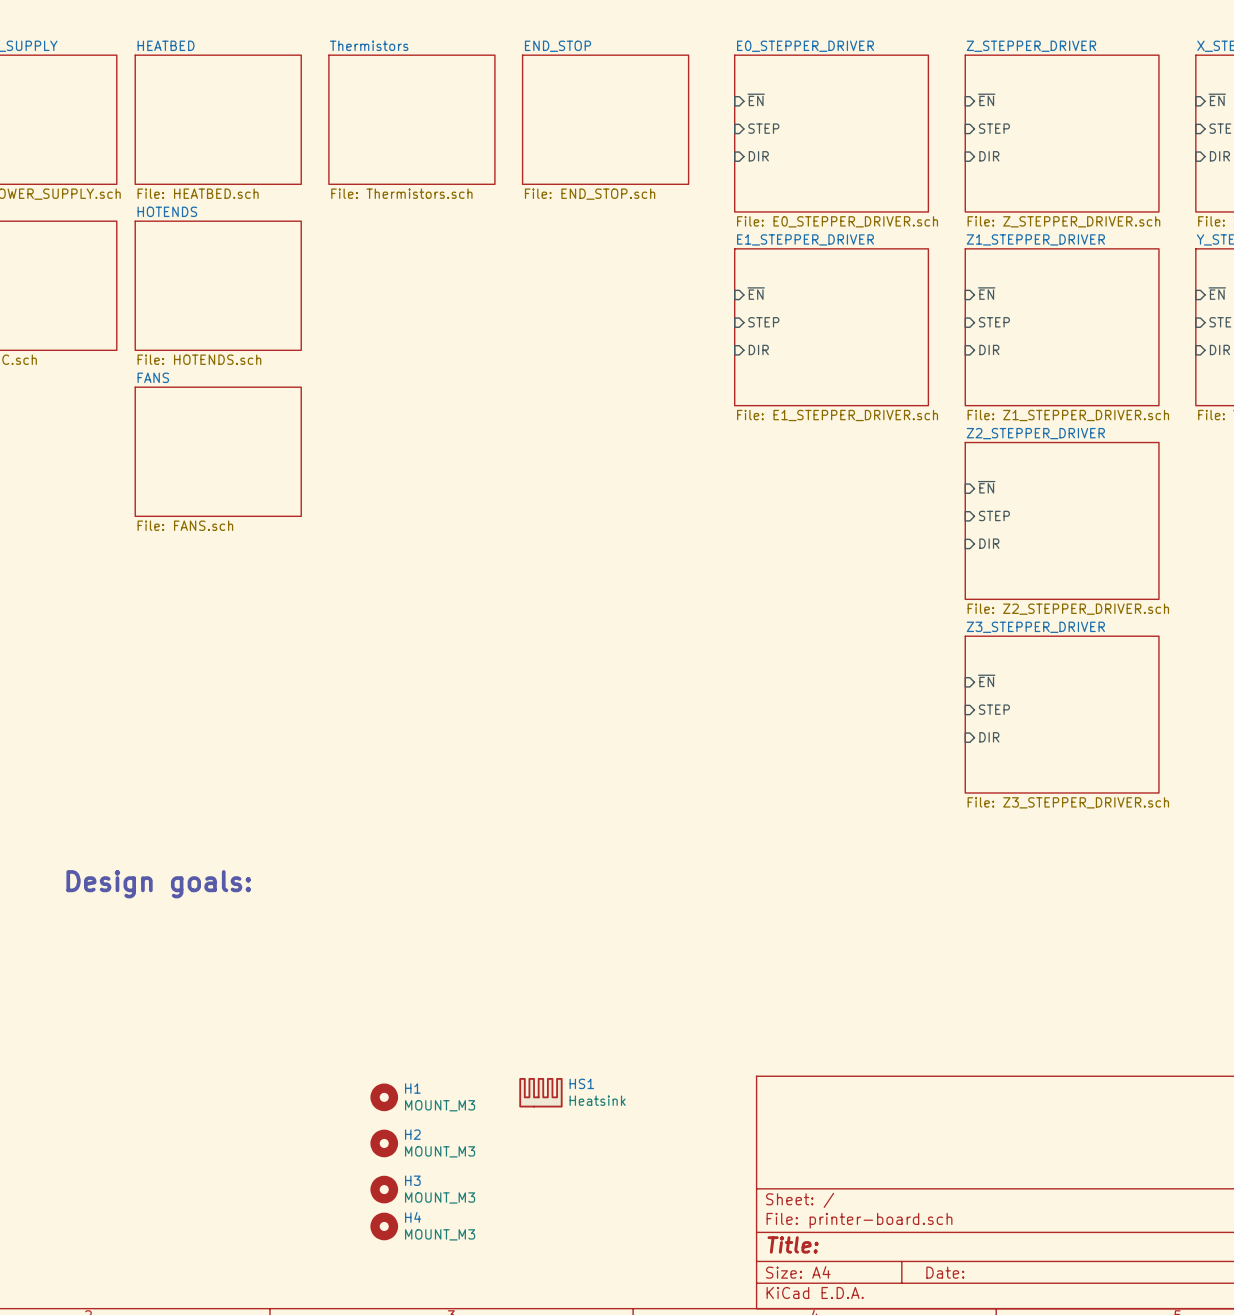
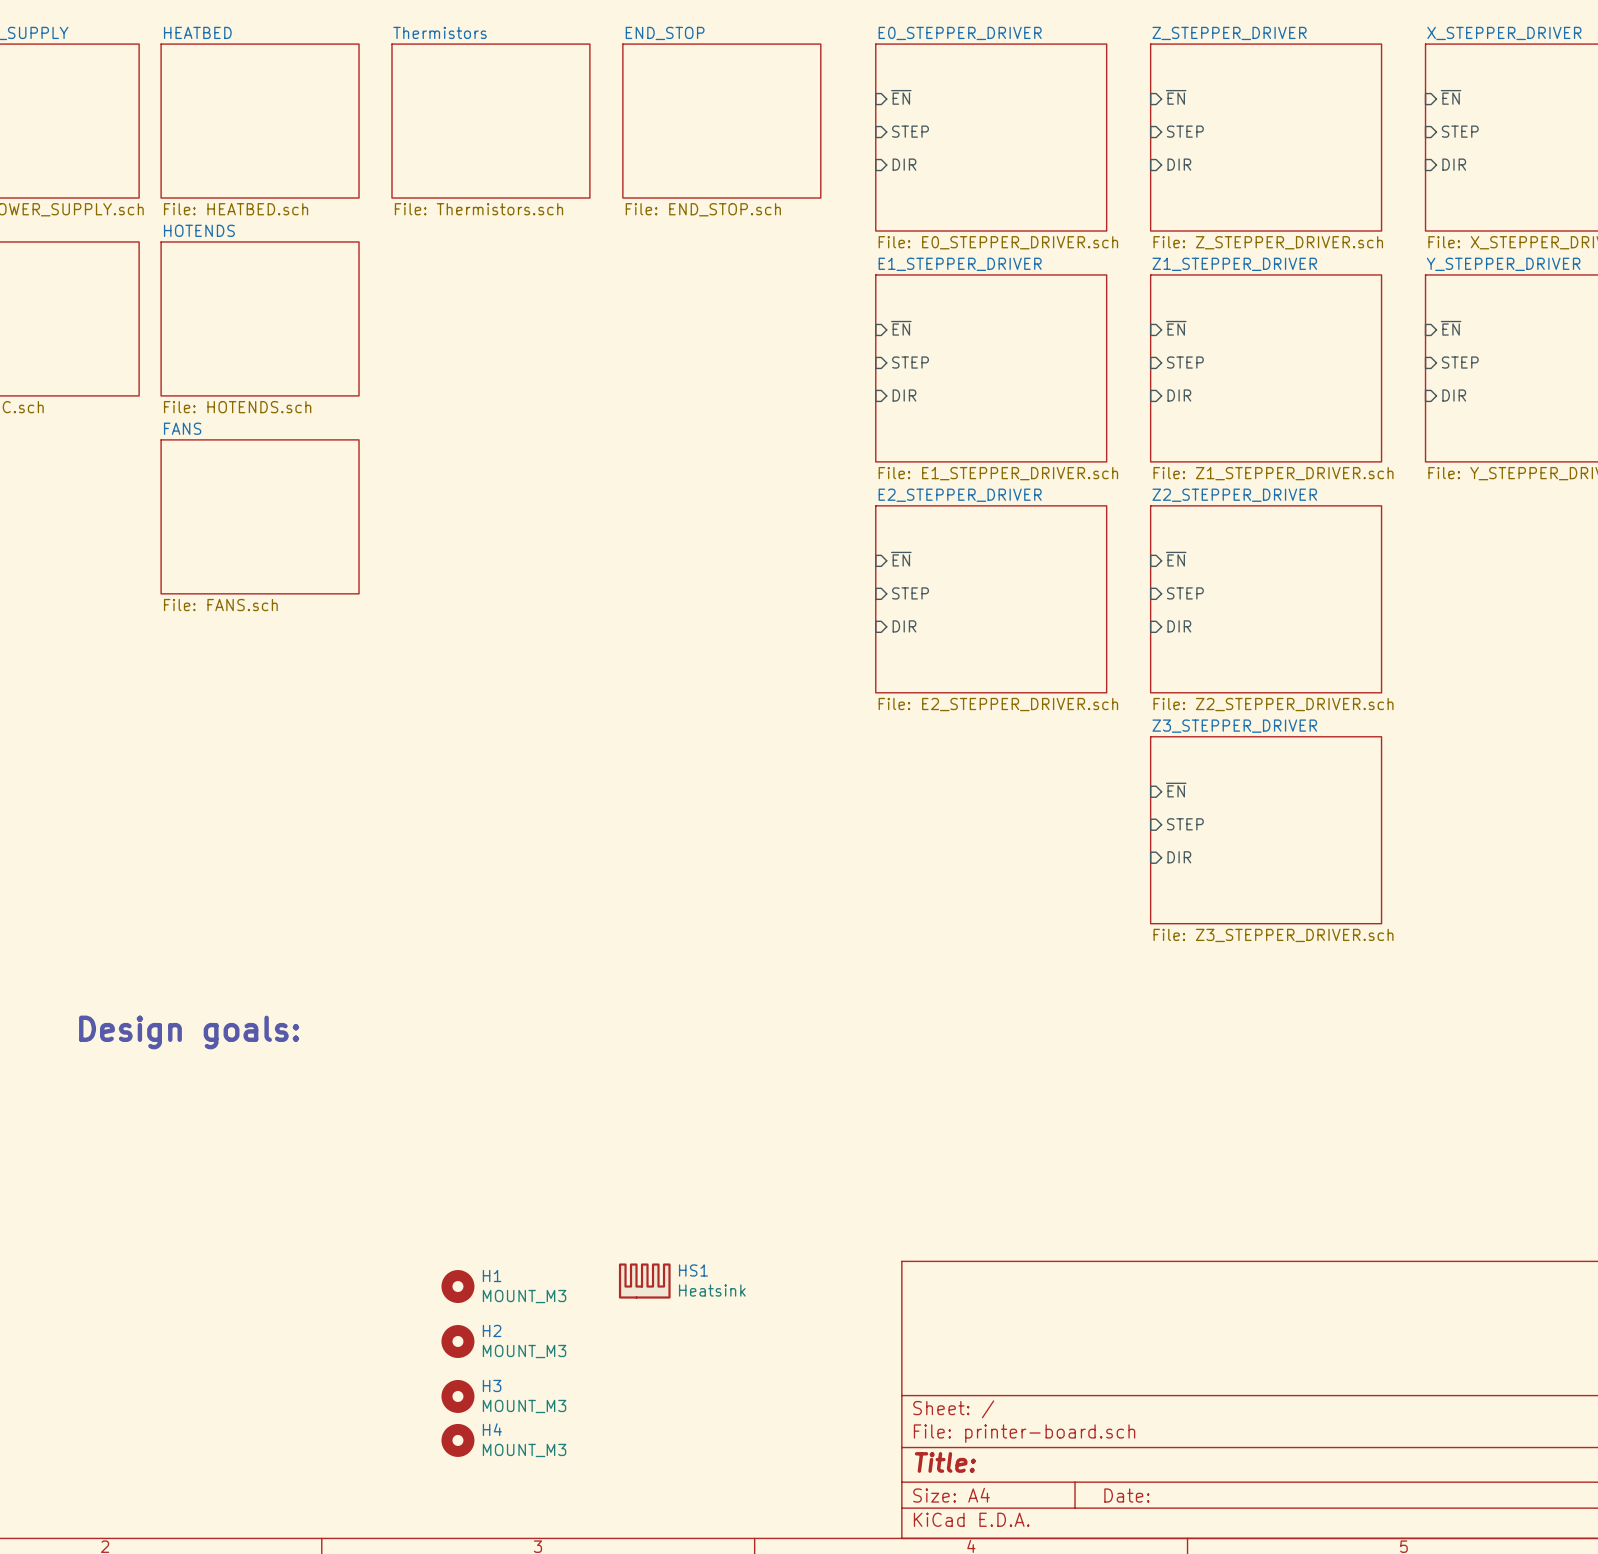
sheet pin: none -> ~{EN} (901, 559)
sheet pin: none -> STEP (910, 593)
sheet E2_STEPPER_DRIVER: none -> File: E2_STEPPER_DRIVER.sch (991, 599)
sheet pin: none -> DIR (904, 626)

